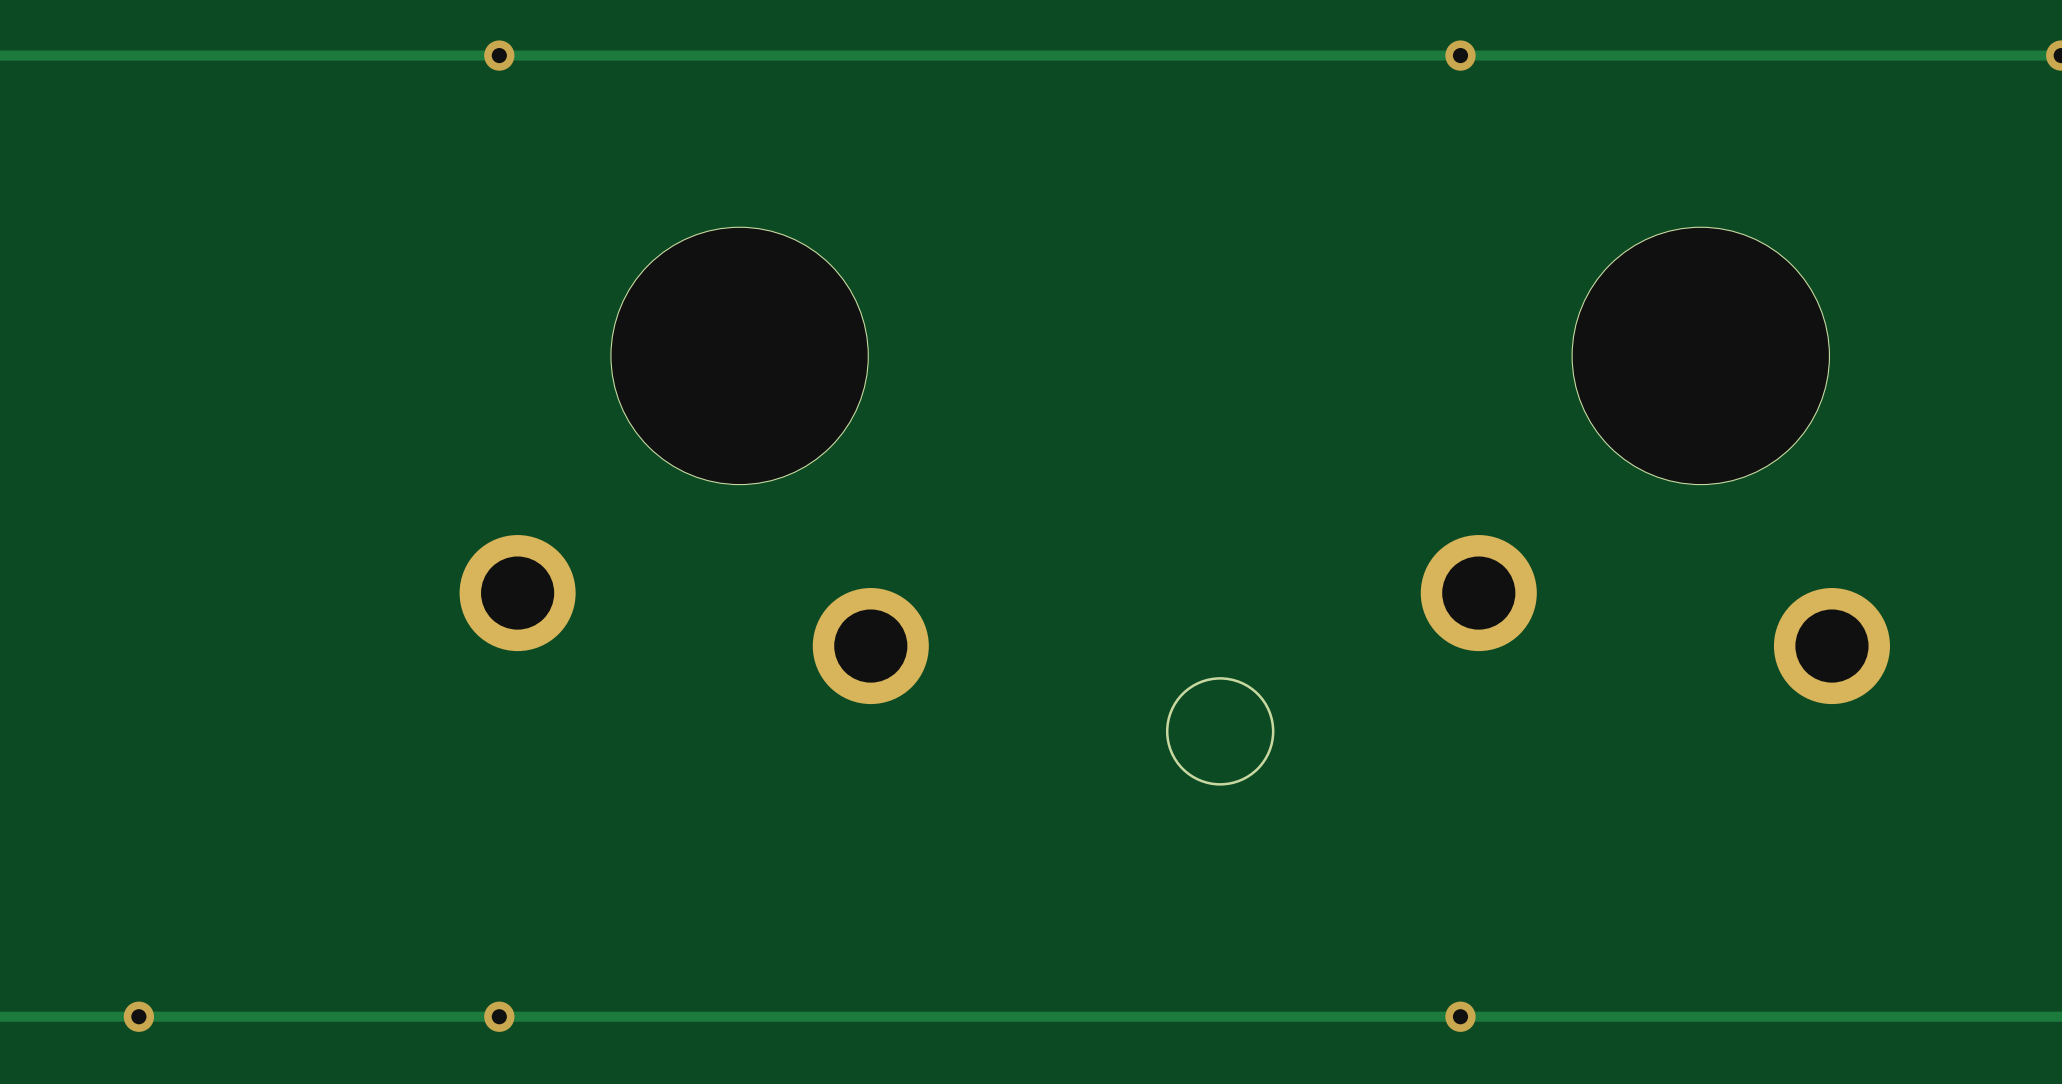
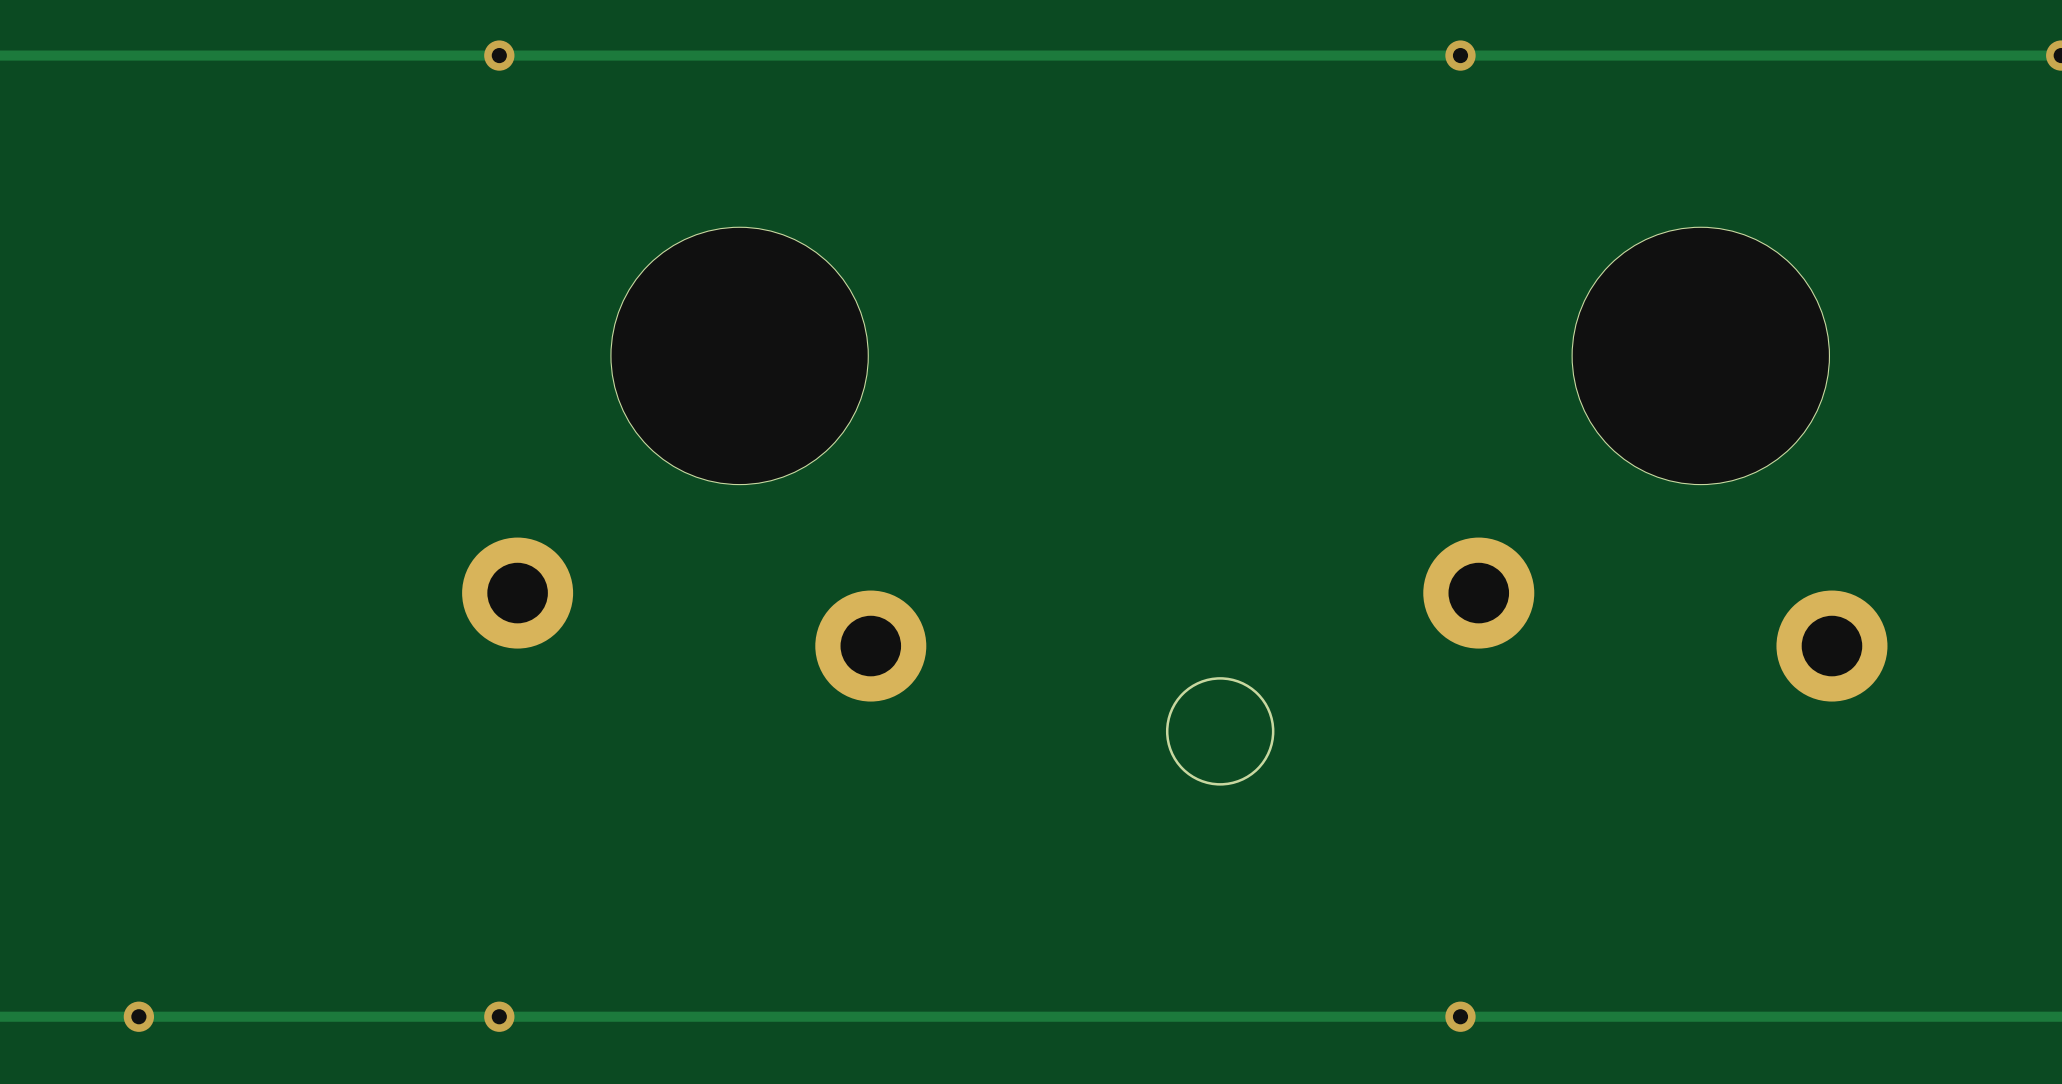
part footprint: [459, 227, 929, 705] -> [462, 227, 927, 702]
part footprint: [1420, 227, 1890, 705] -> [1423, 227, 1888, 702]

